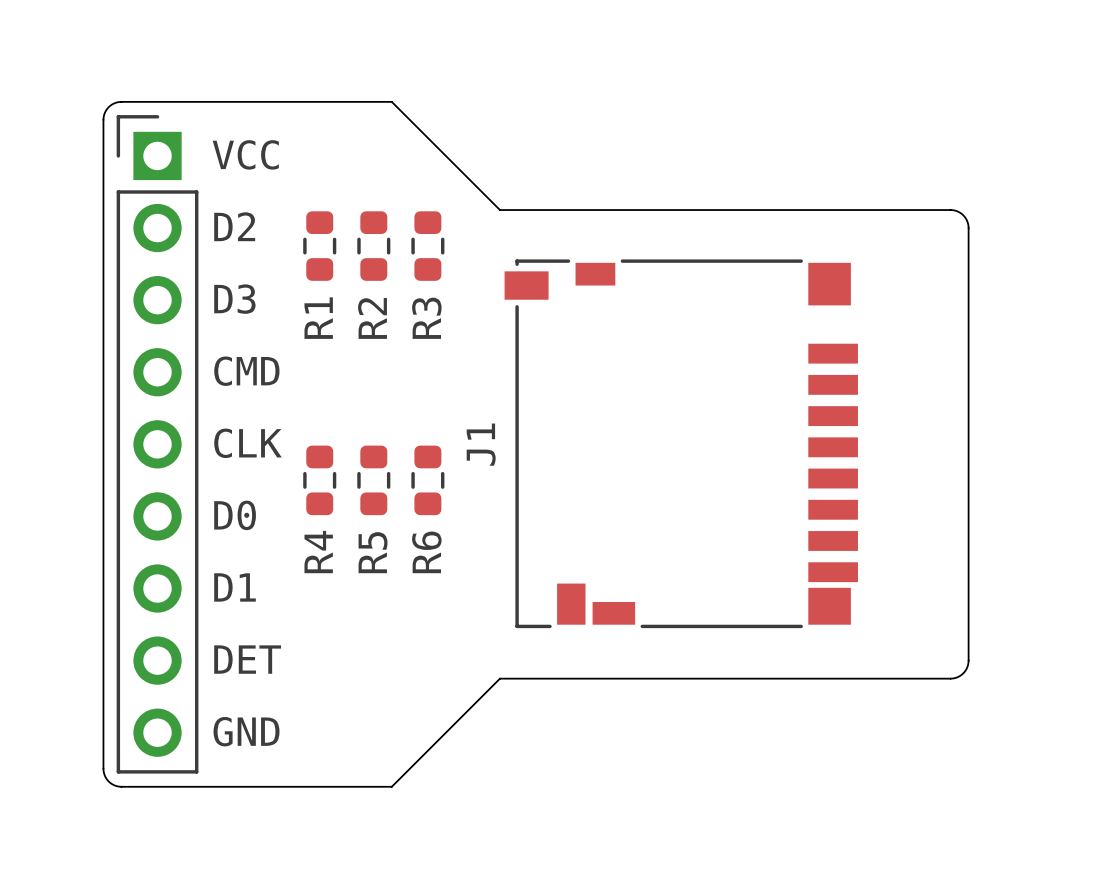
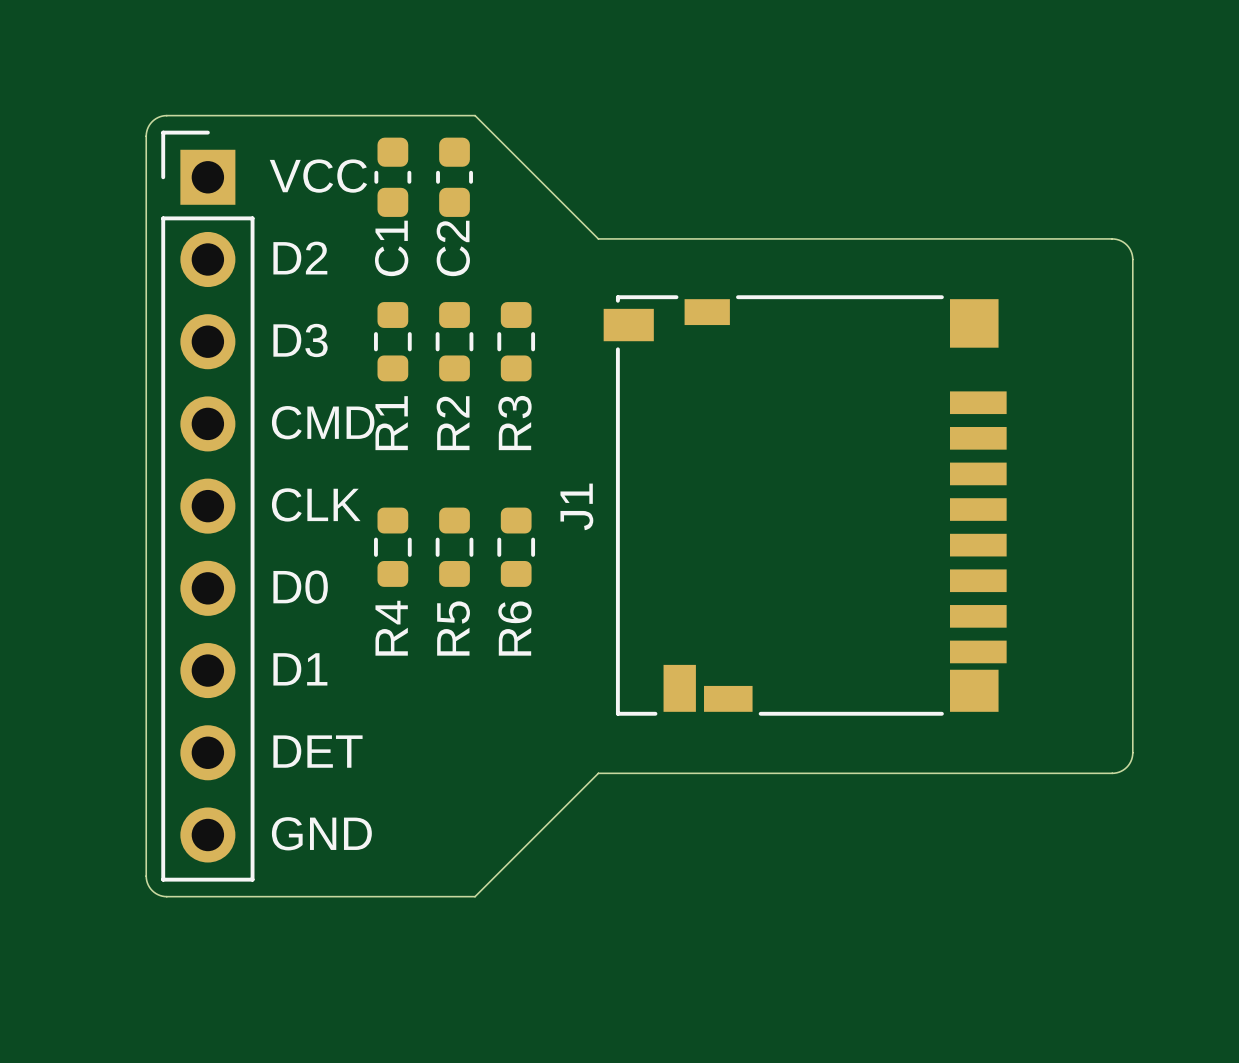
C1: none -> (392, 177)
C2: none -> (454, 177)
R1 position: (319, 246) -> (392, 341)
R2 position: (373, 246) -> (454, 341)
R3 position: (427, 246) -> (516, 341)

